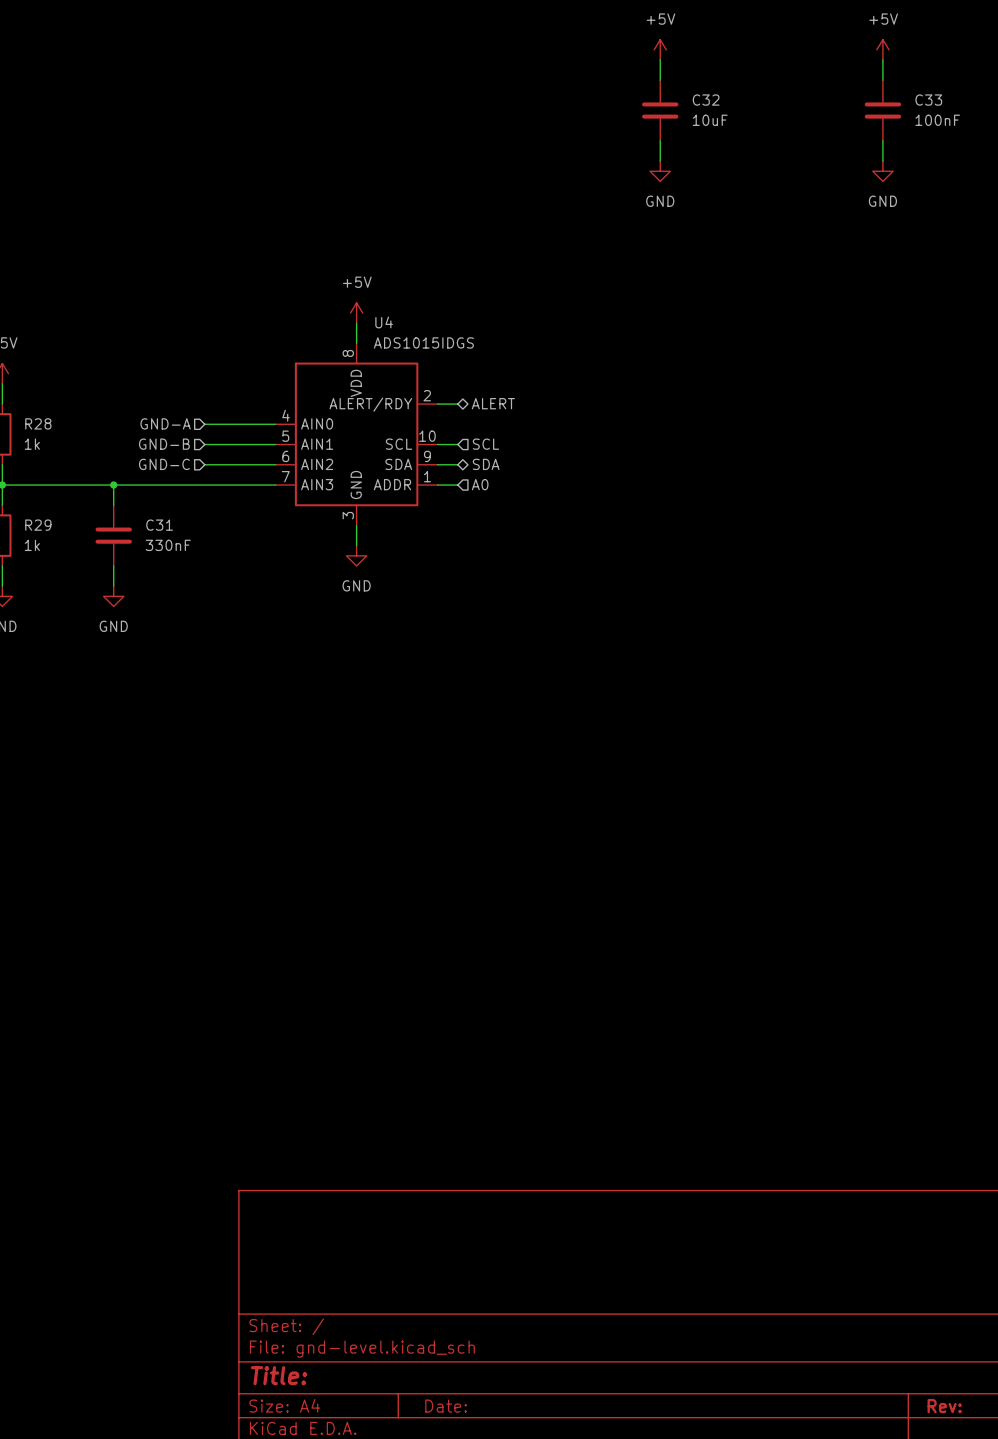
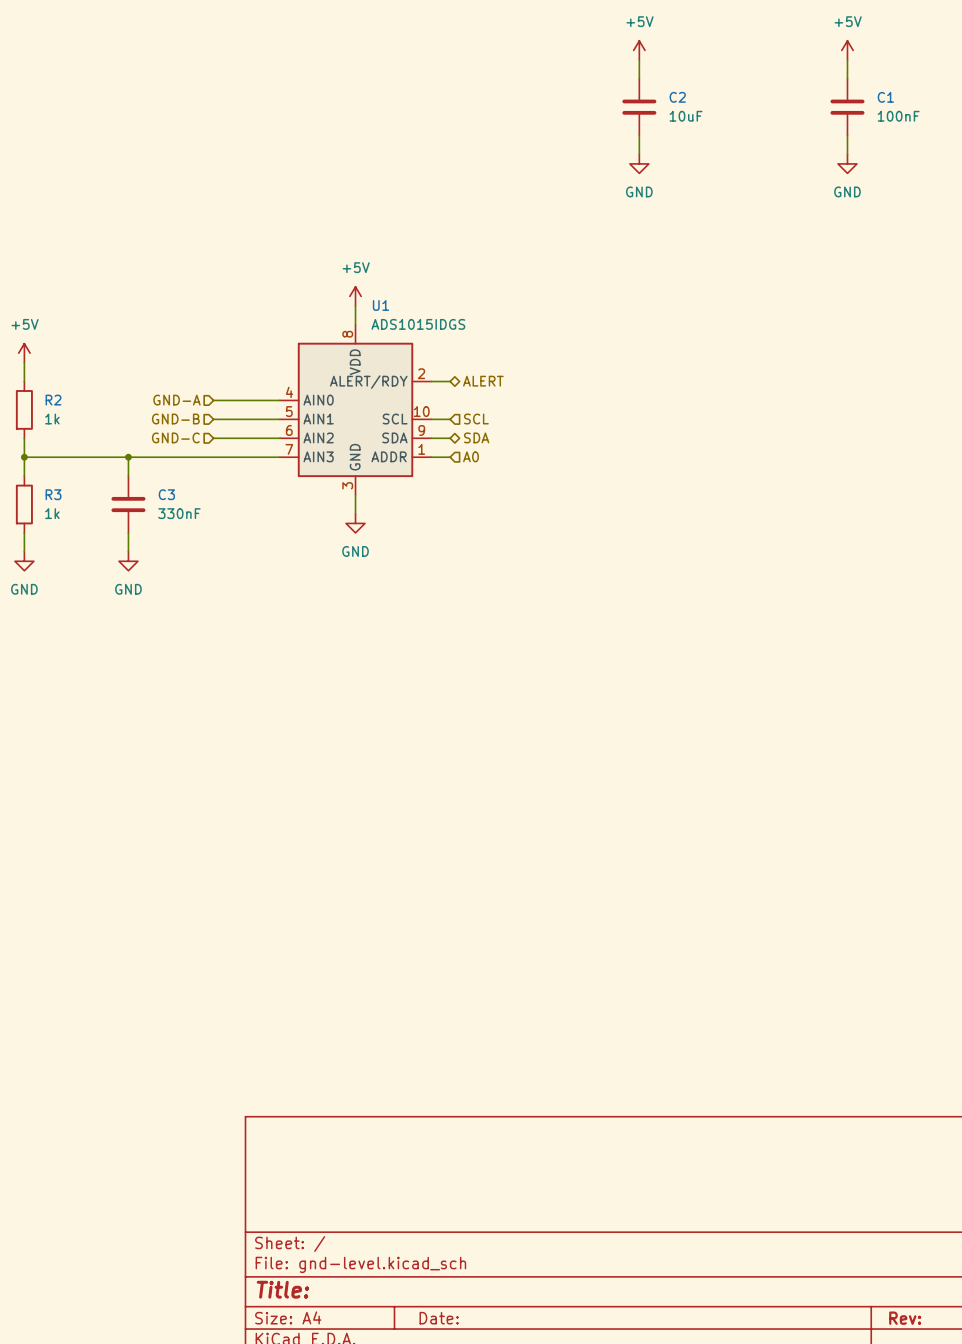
C32 name: C32 (706, 100) -> C2 (677, 97)
C33 name: C33 (928, 100) -> C1 (885, 97)
U4 name: U4 (384, 322) -> U1 (380, 305)
R28 name: R28 (38, 423) -> R2 (53, 400)
R29 name: R29 (38, 525) -> R3 (53, 494)
C31 name: C31 (159, 525) -> C3 (166, 494)

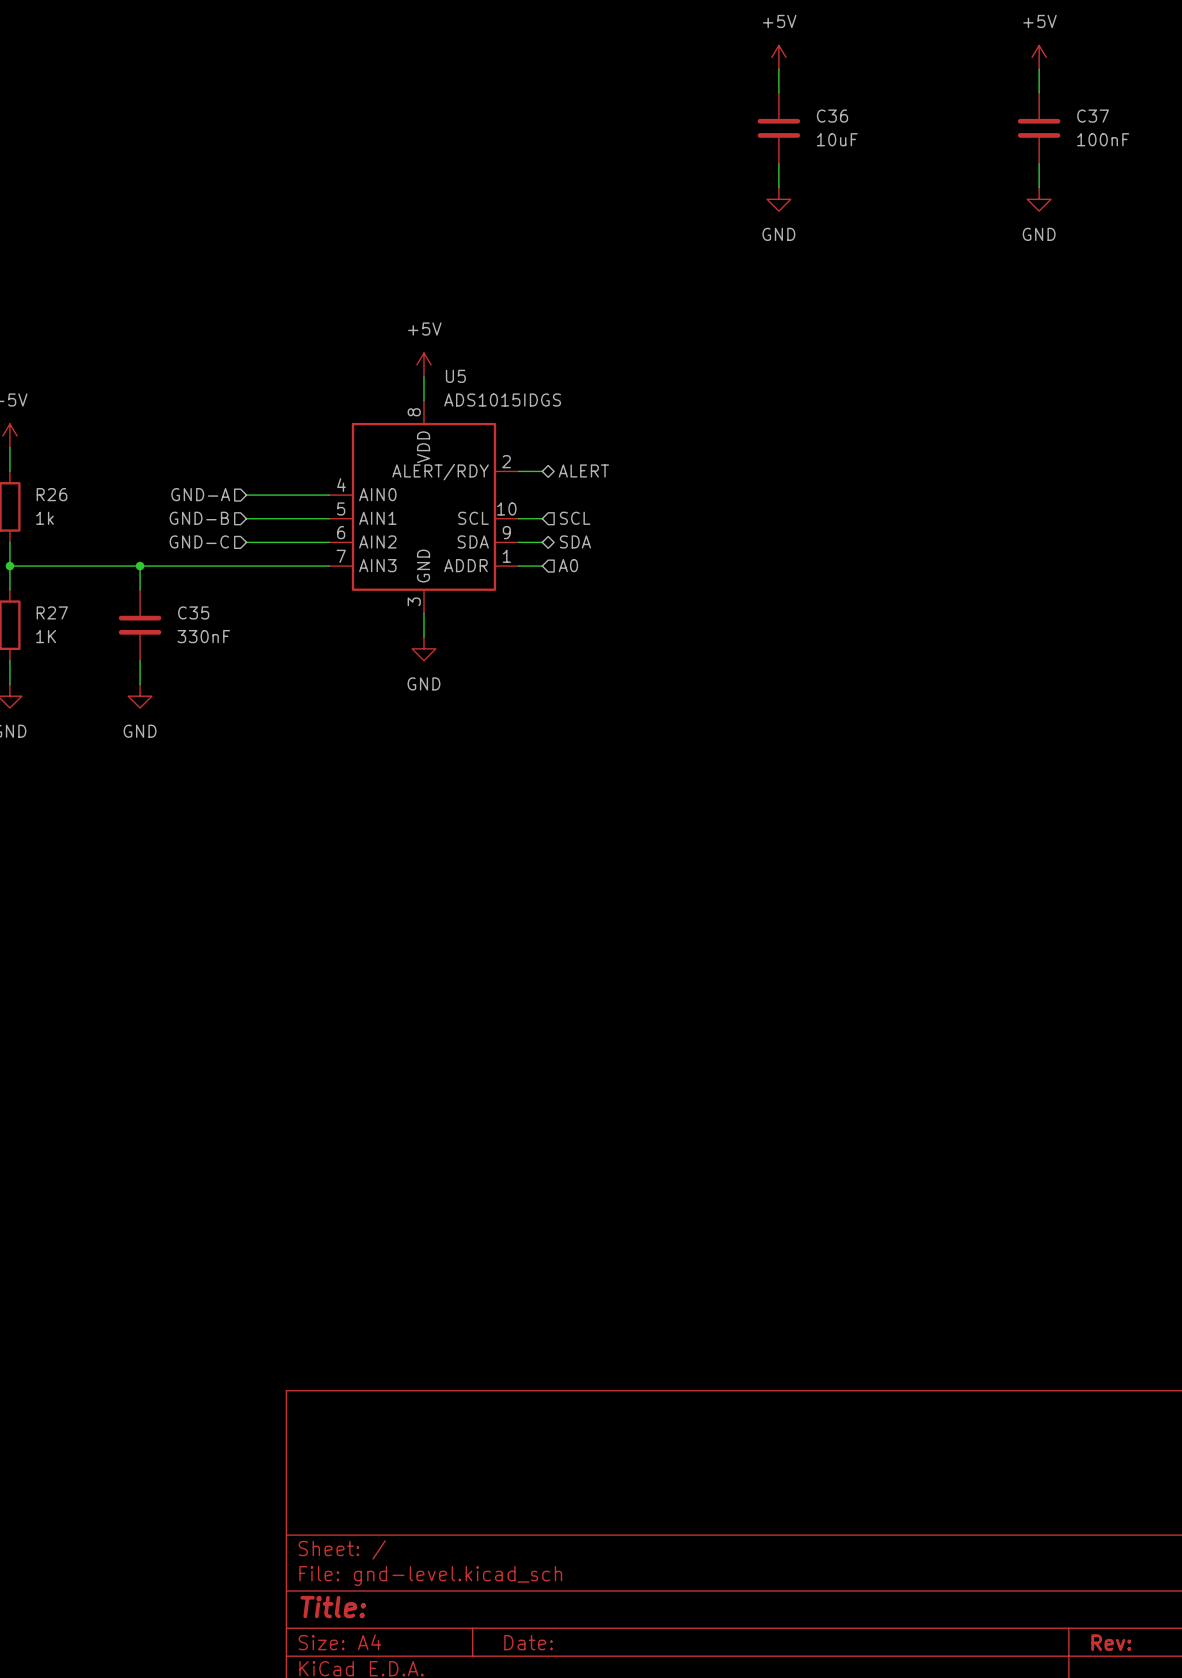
C2 name: C2 (677, 97) -> C36 (832, 116)
C1 name: C1 (885, 97) -> C37 (1093, 116)
U1 name: U1 (380, 305) -> U5 (455, 376)
R2 name: R2 (53, 400) -> R26 (51, 494)
R3 name: R3 (53, 494) -> R27 (52, 612)
C3 name: C3 (166, 494) -> C35 (193, 612)
R3 value: 1k (52, 513) -> 1K (46, 636)

